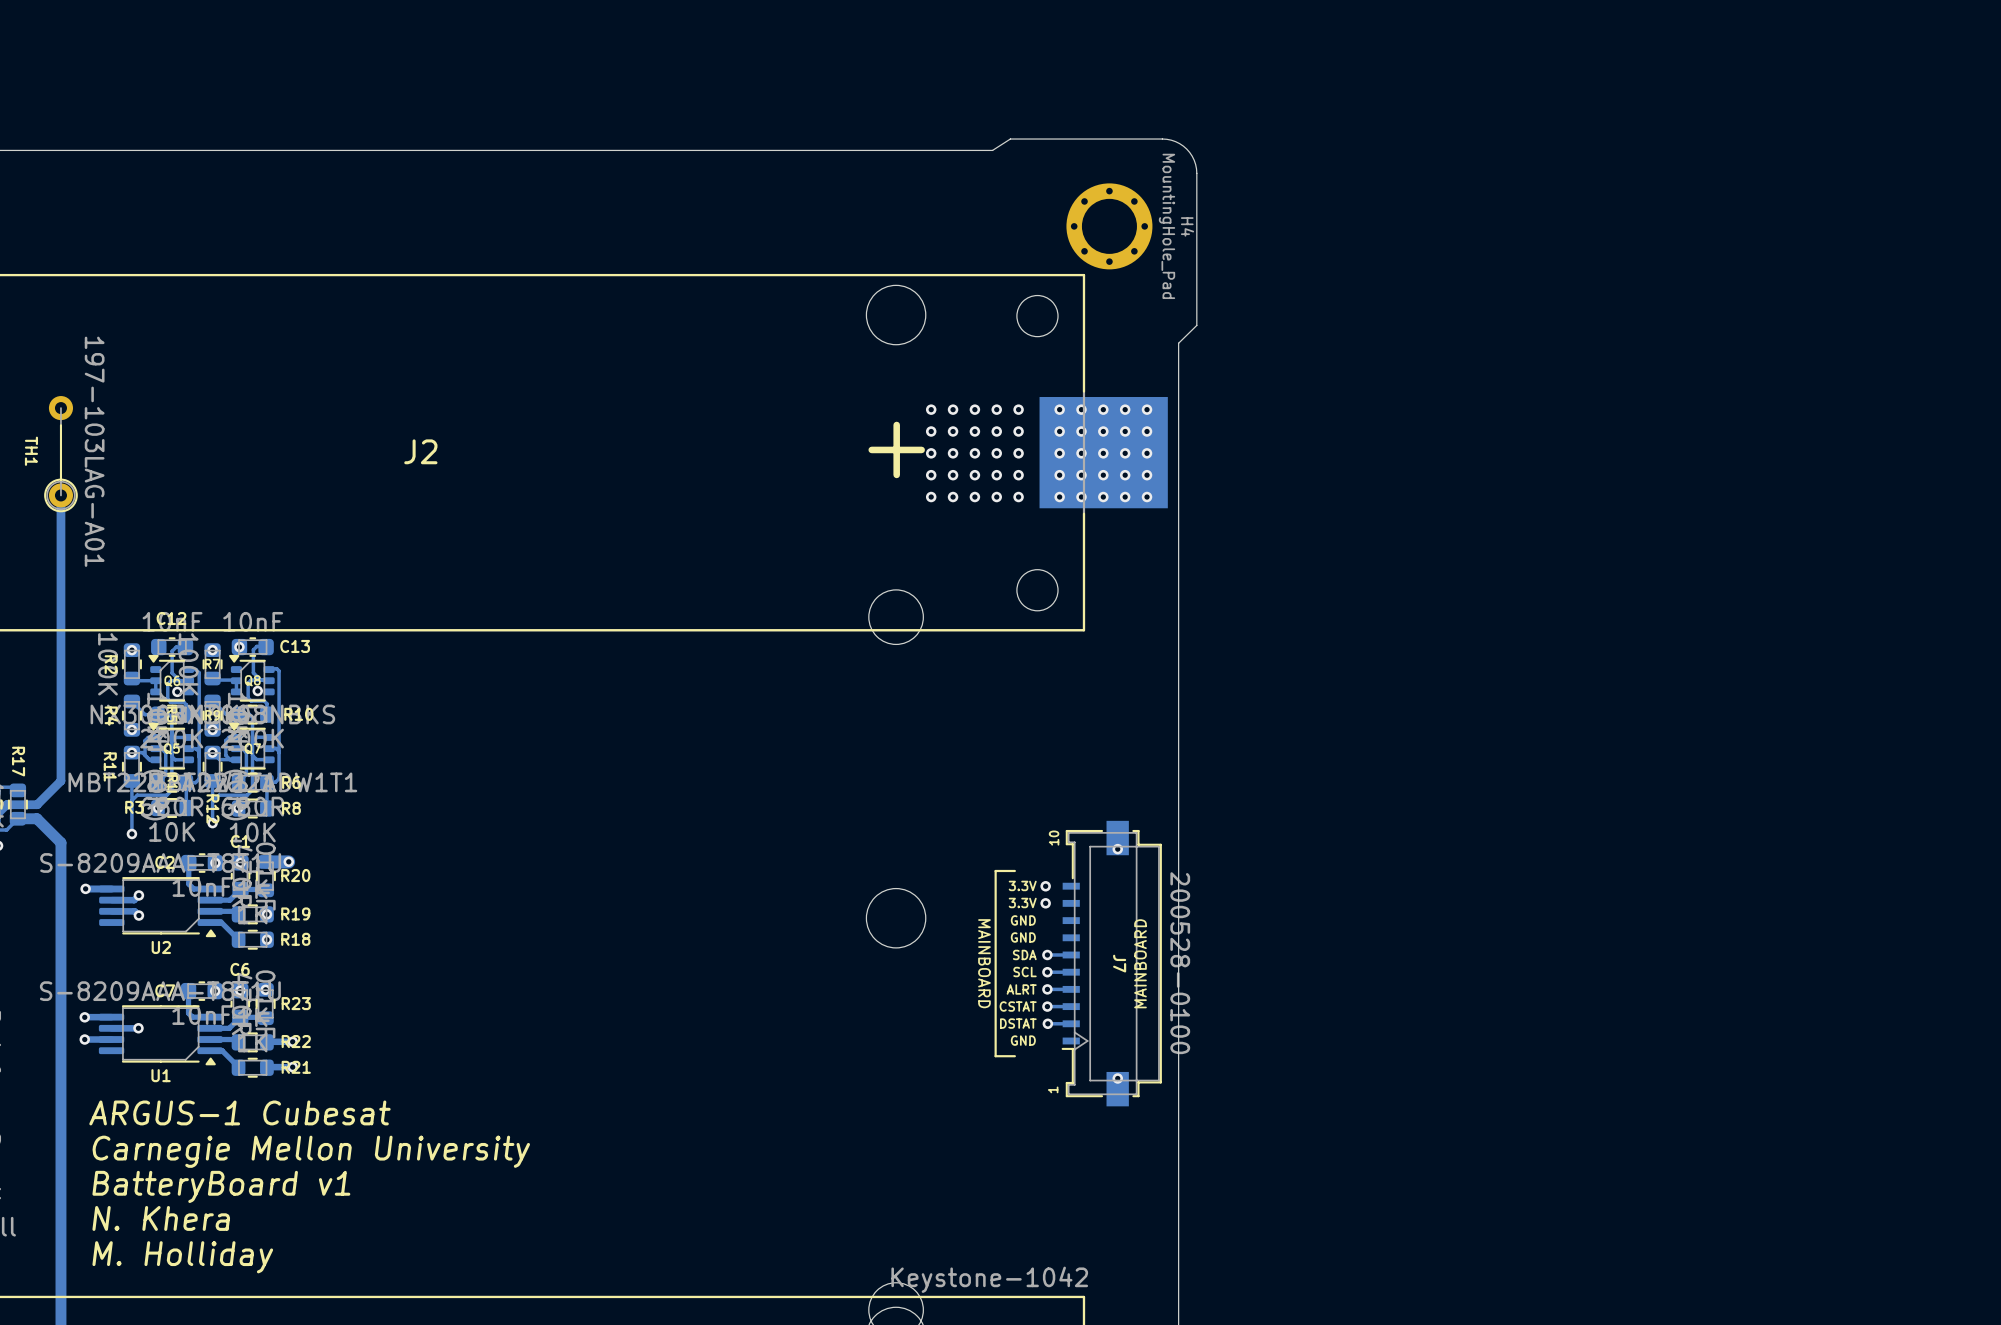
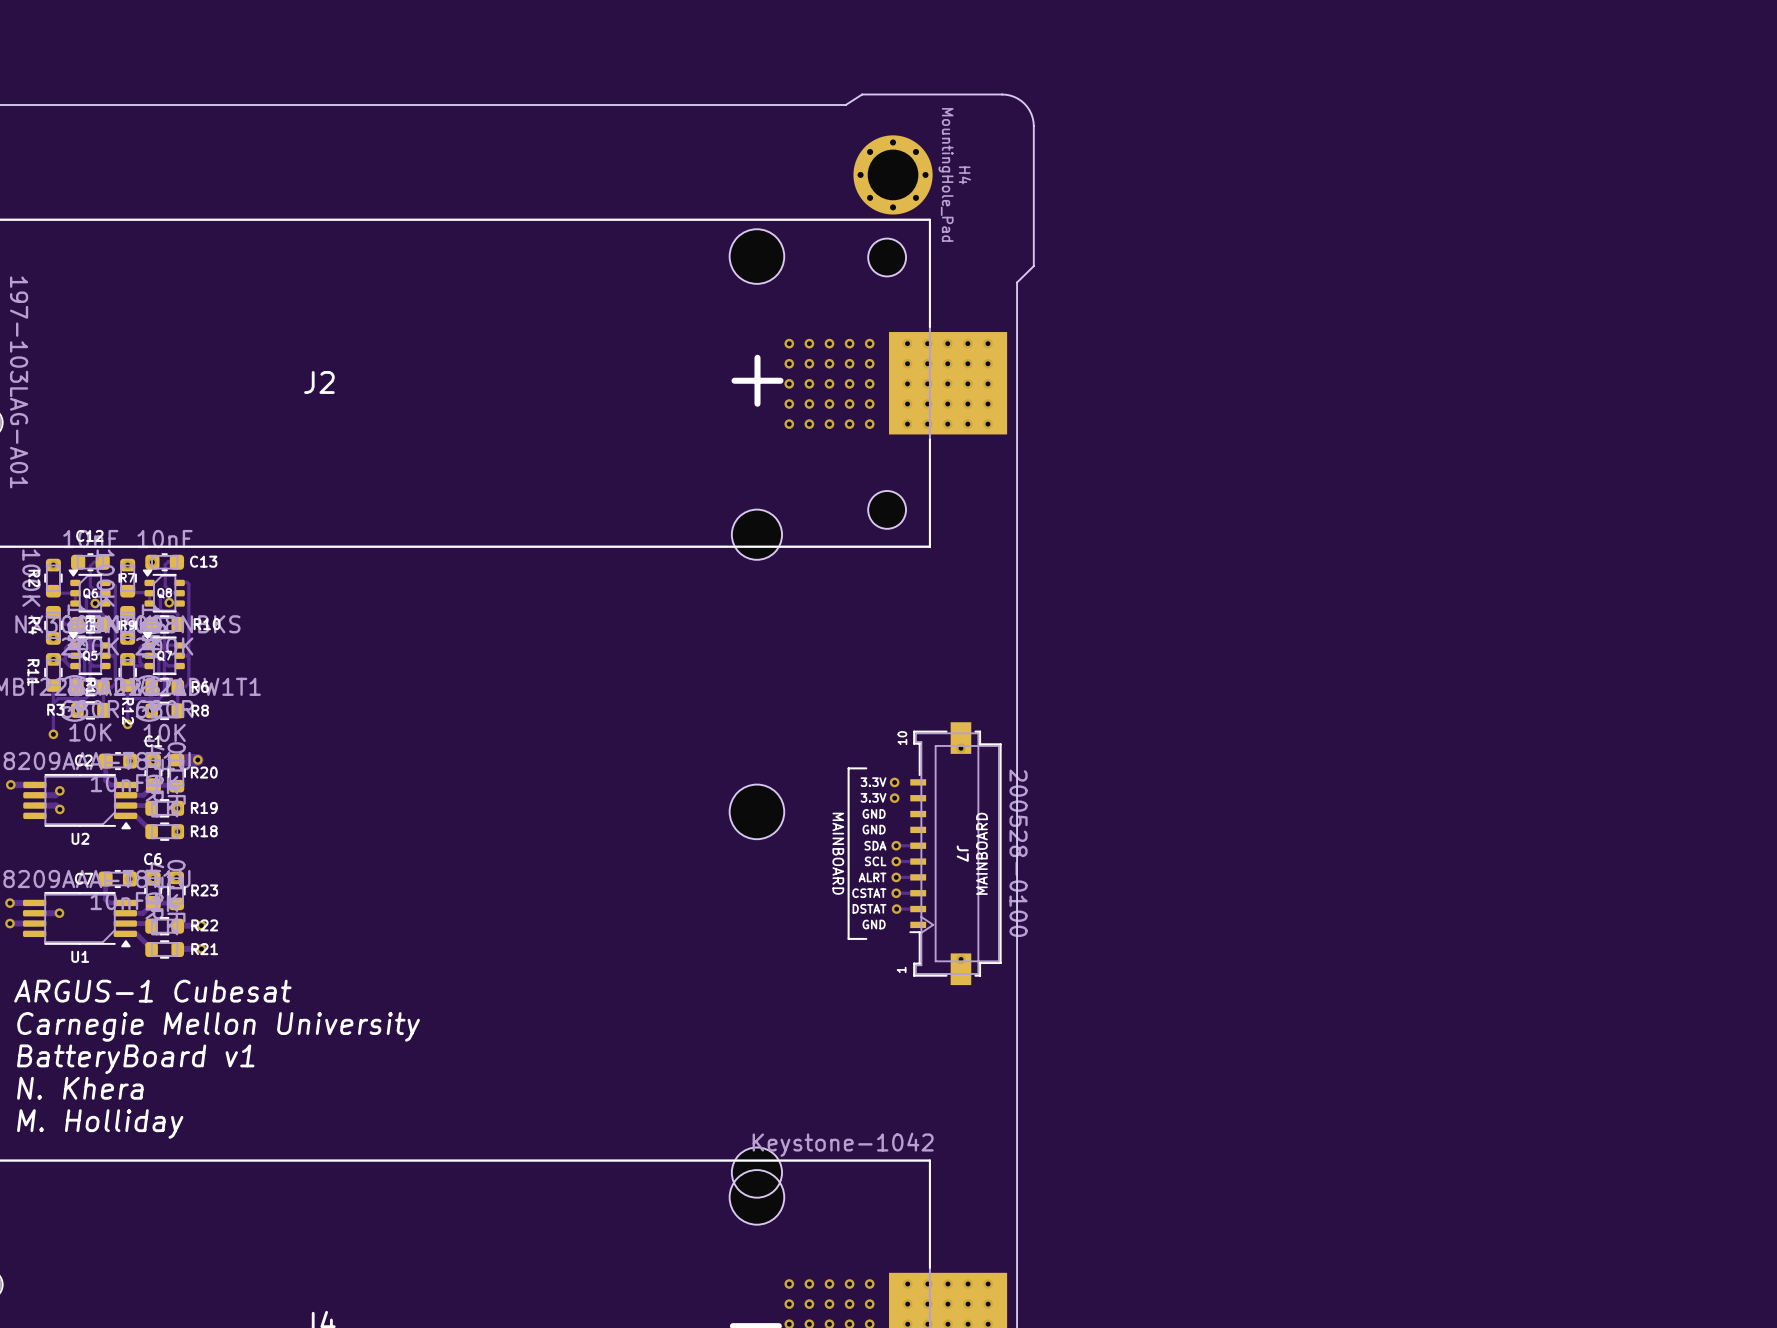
H4 position: (1109, 226) -> (893, 174)

